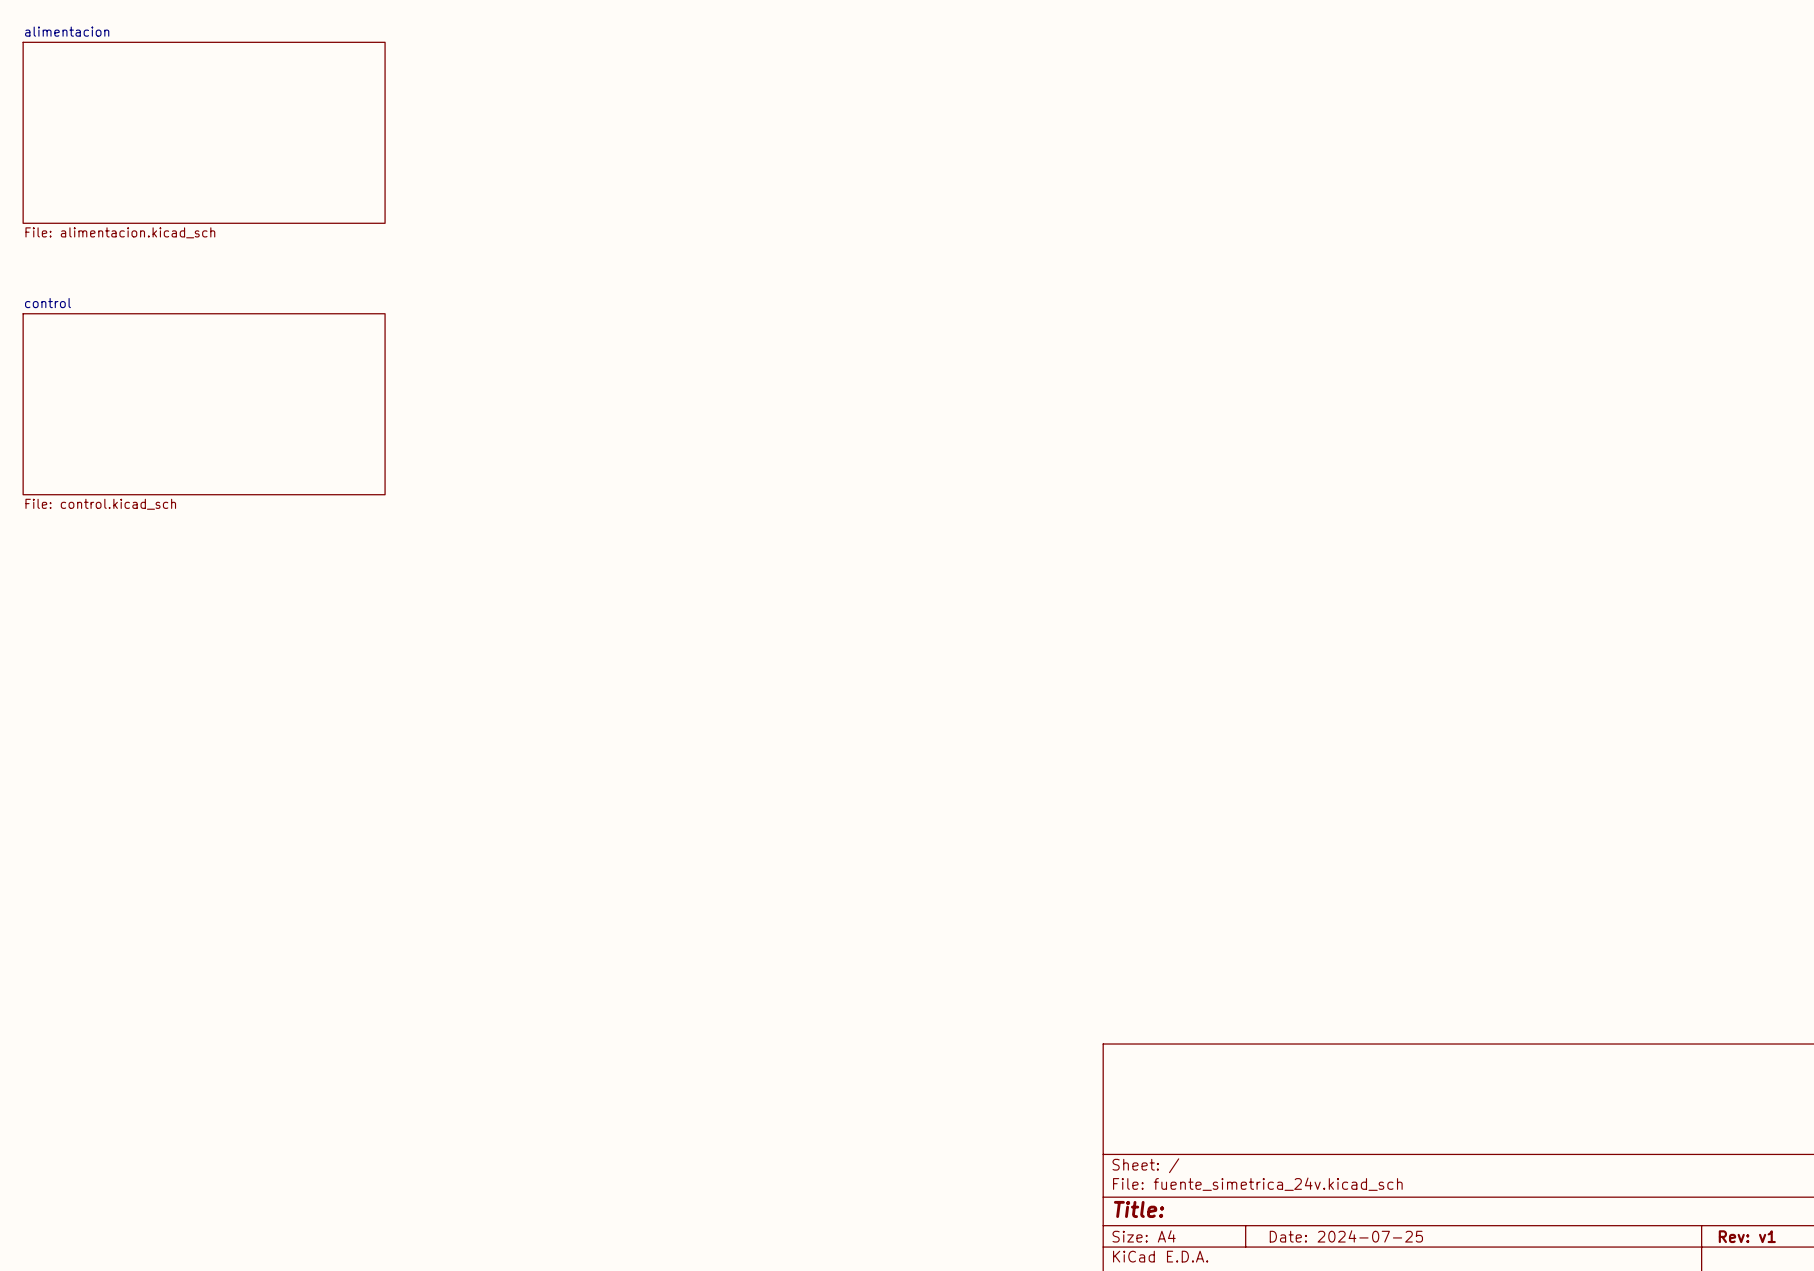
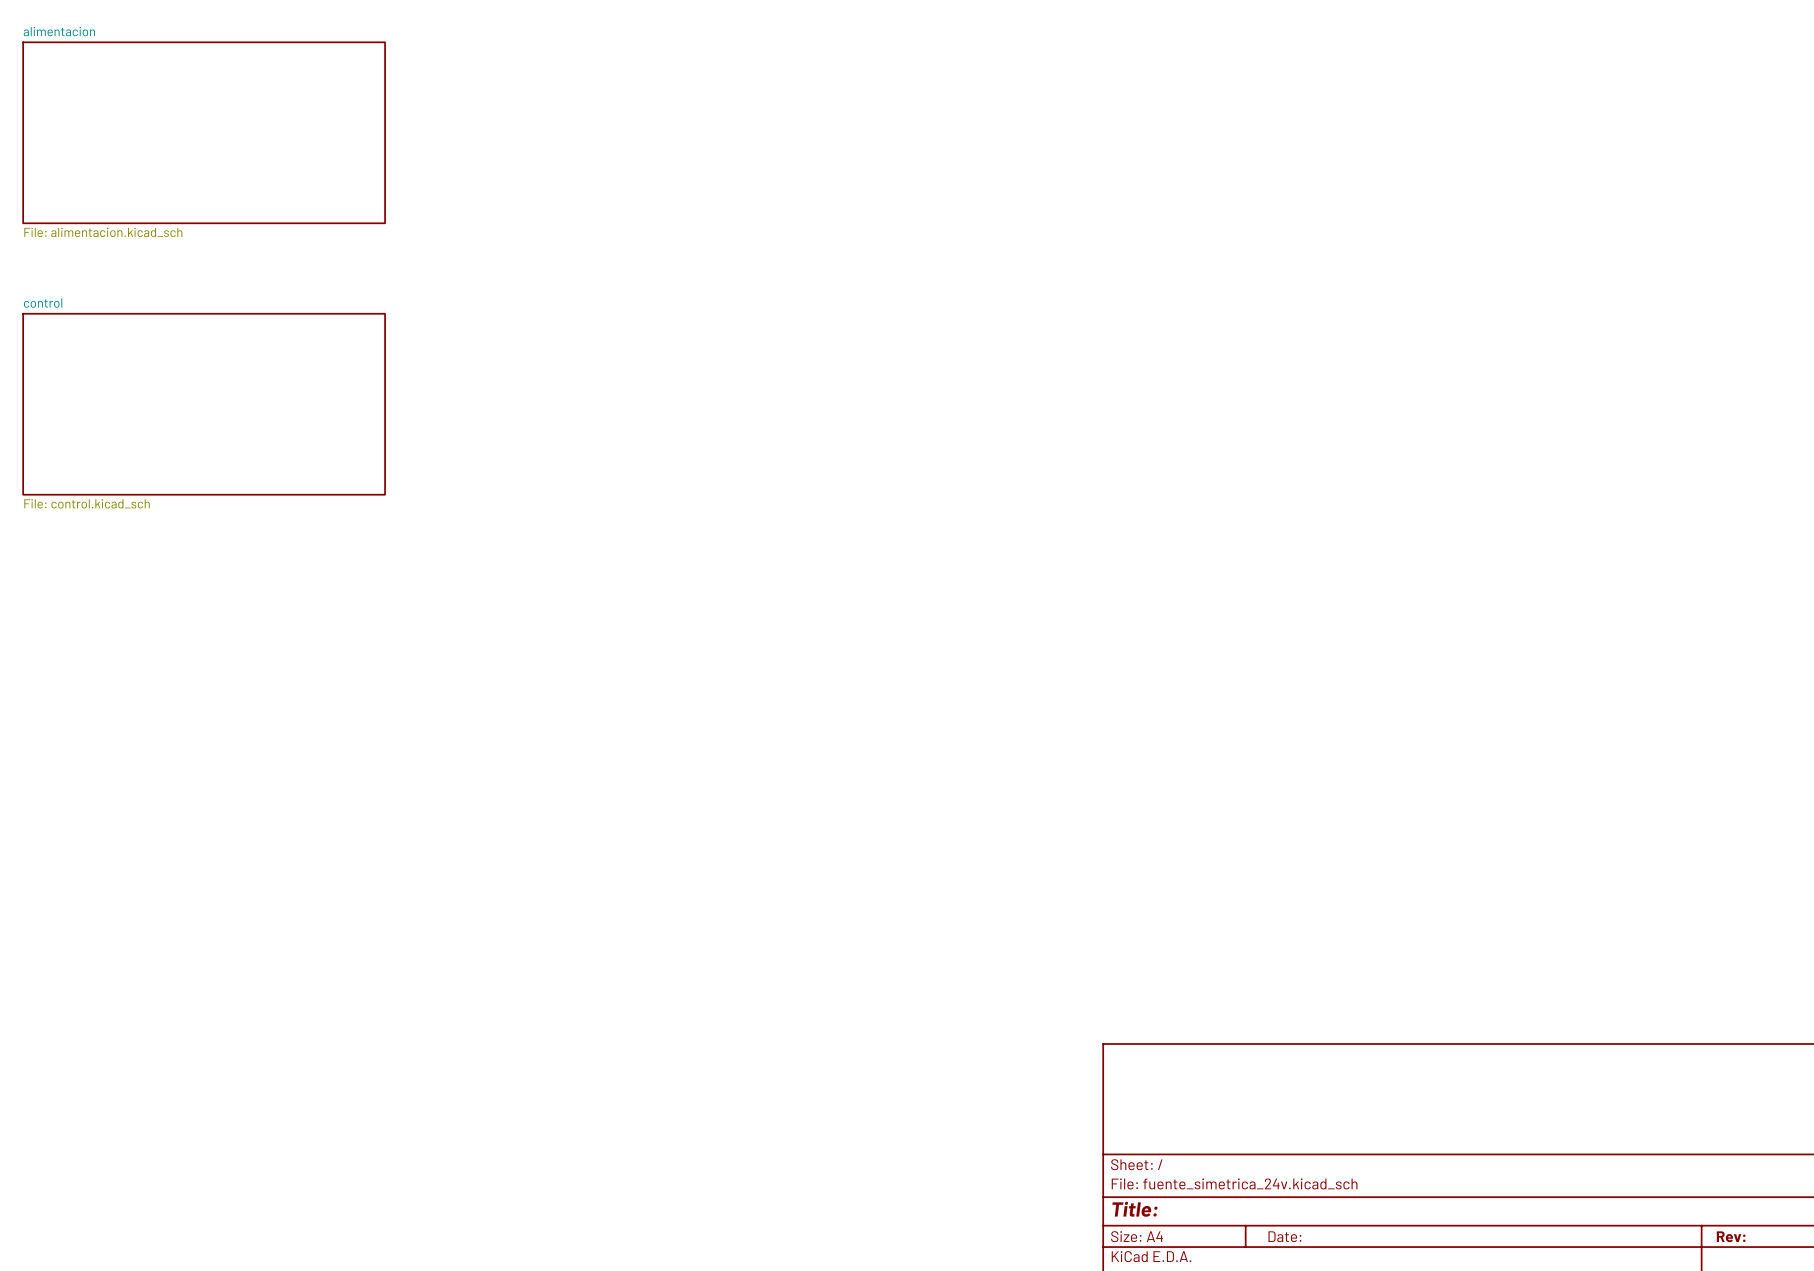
title block: Date: 2024-07-25 (1346, 1236) -> Date: (1284, 1236)
title block: Rev: v1 (1747, 1236) -> Rev: (1731, 1236)

